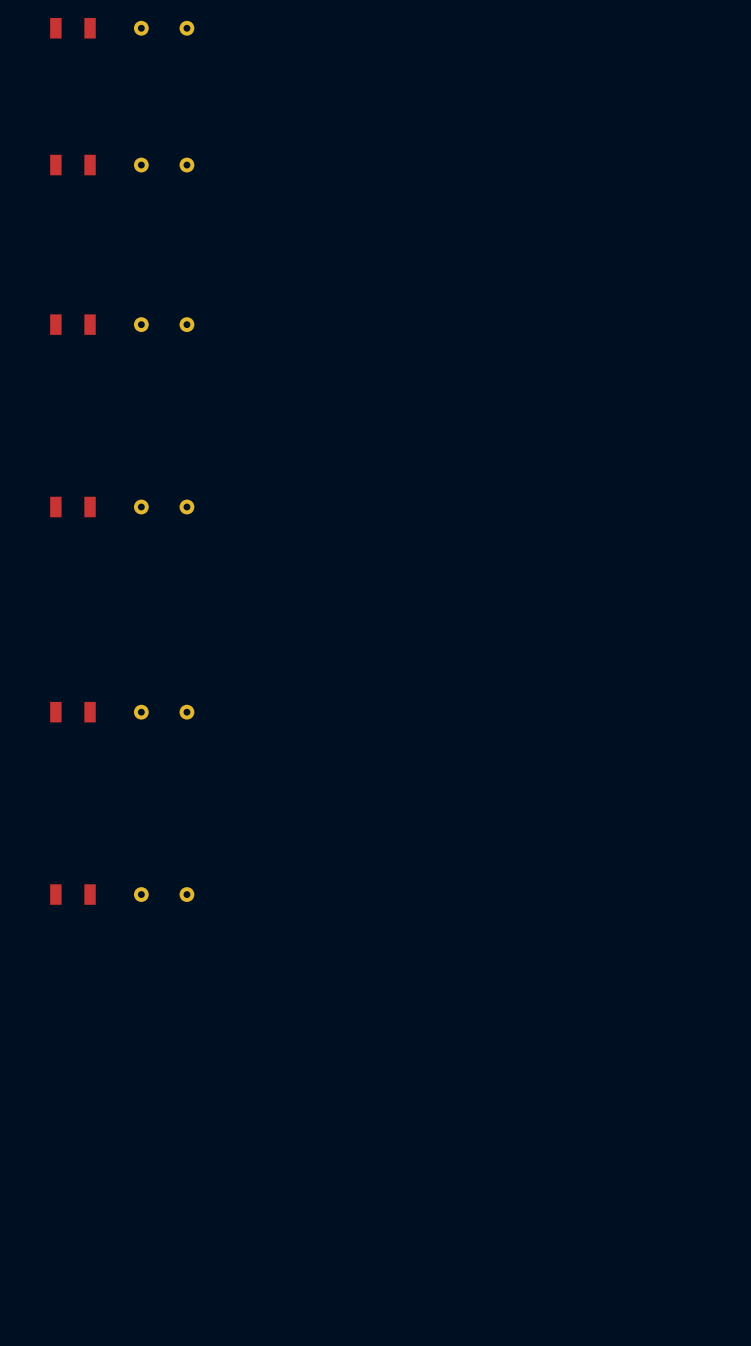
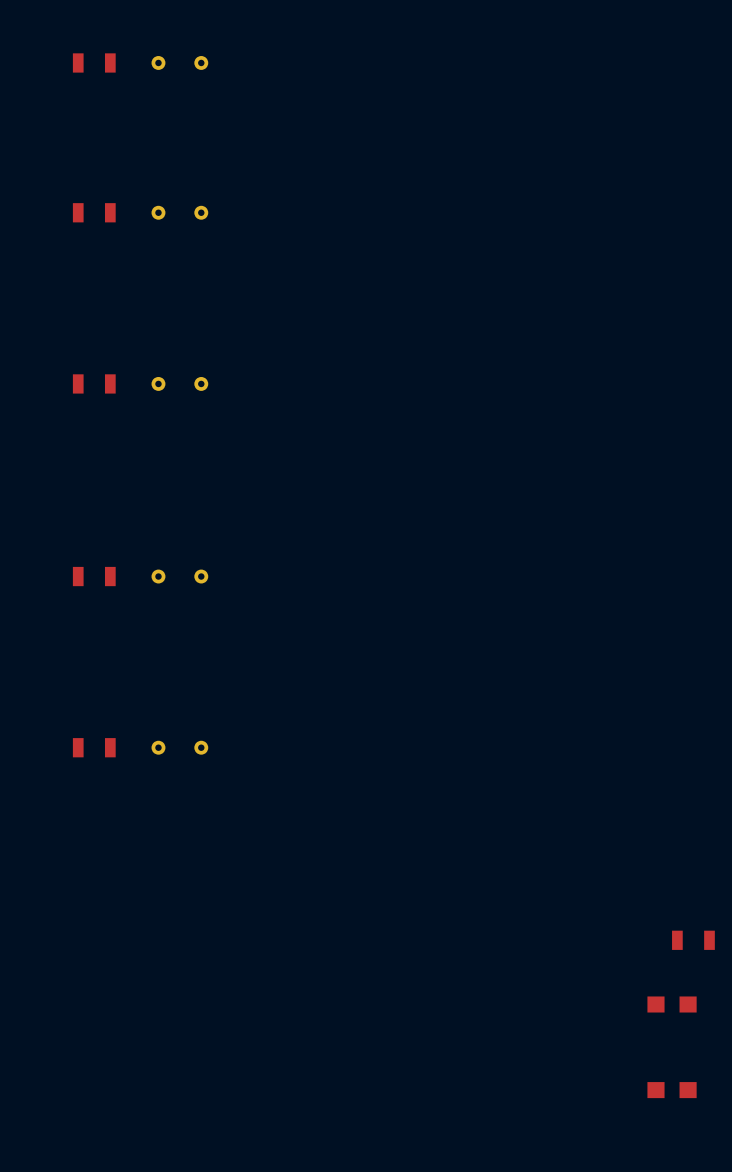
part: none -> (693, 940)
part: none -> (672, 1004)
part: none -> (672, 1090)

